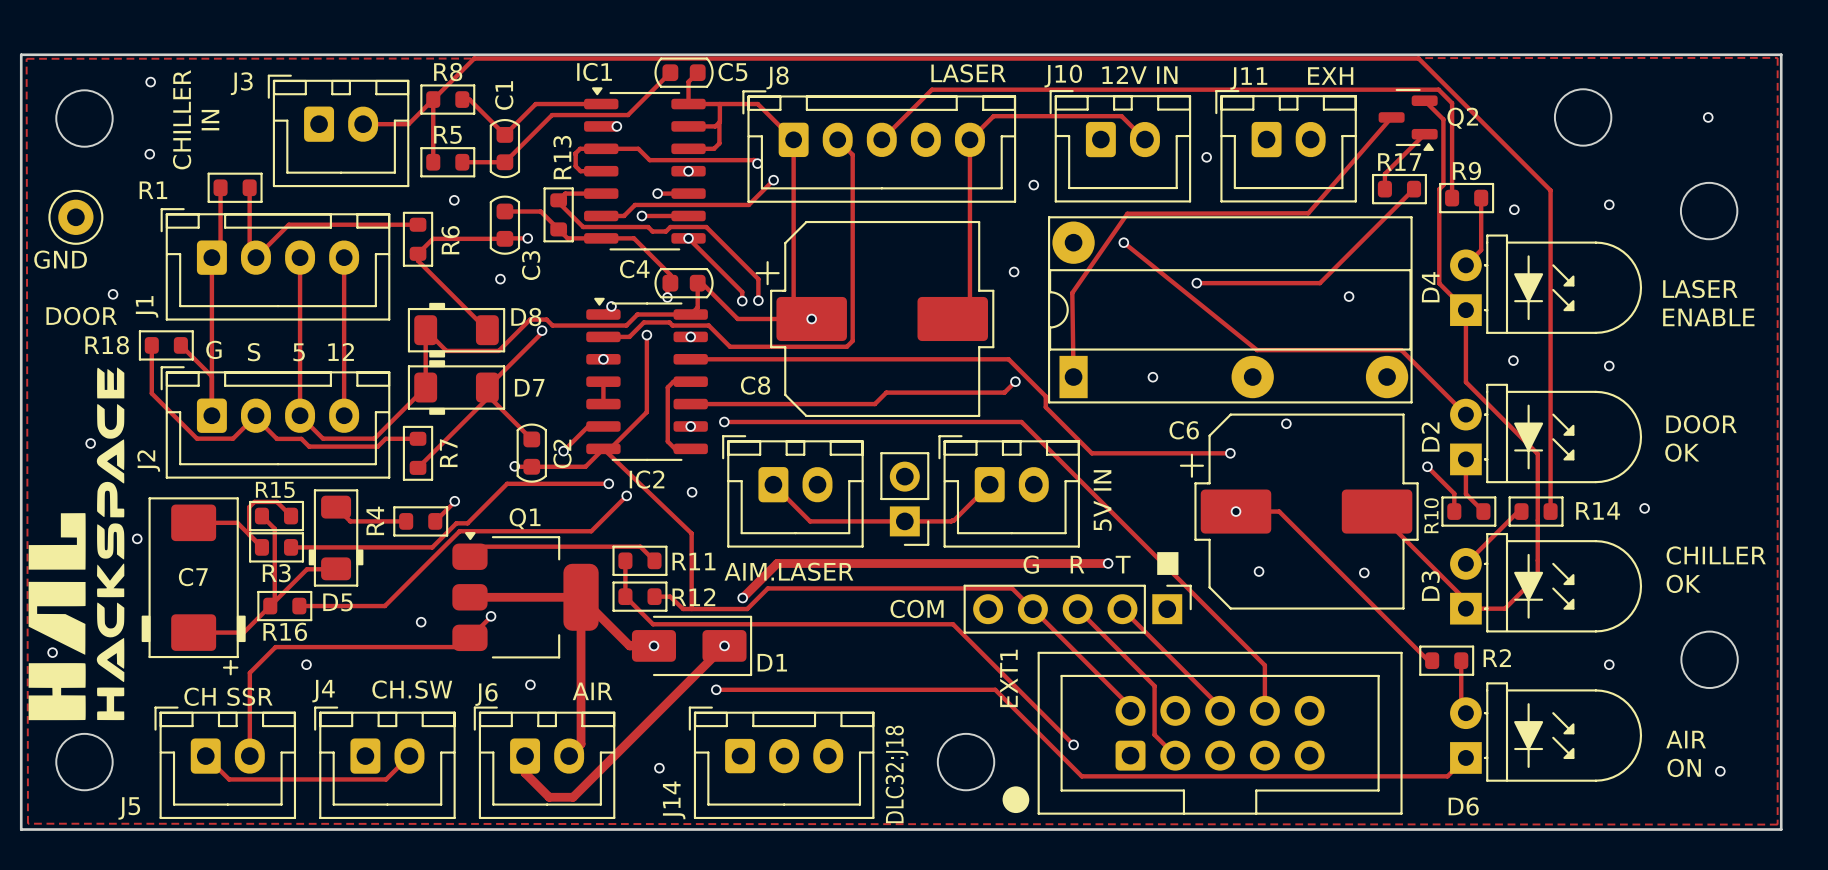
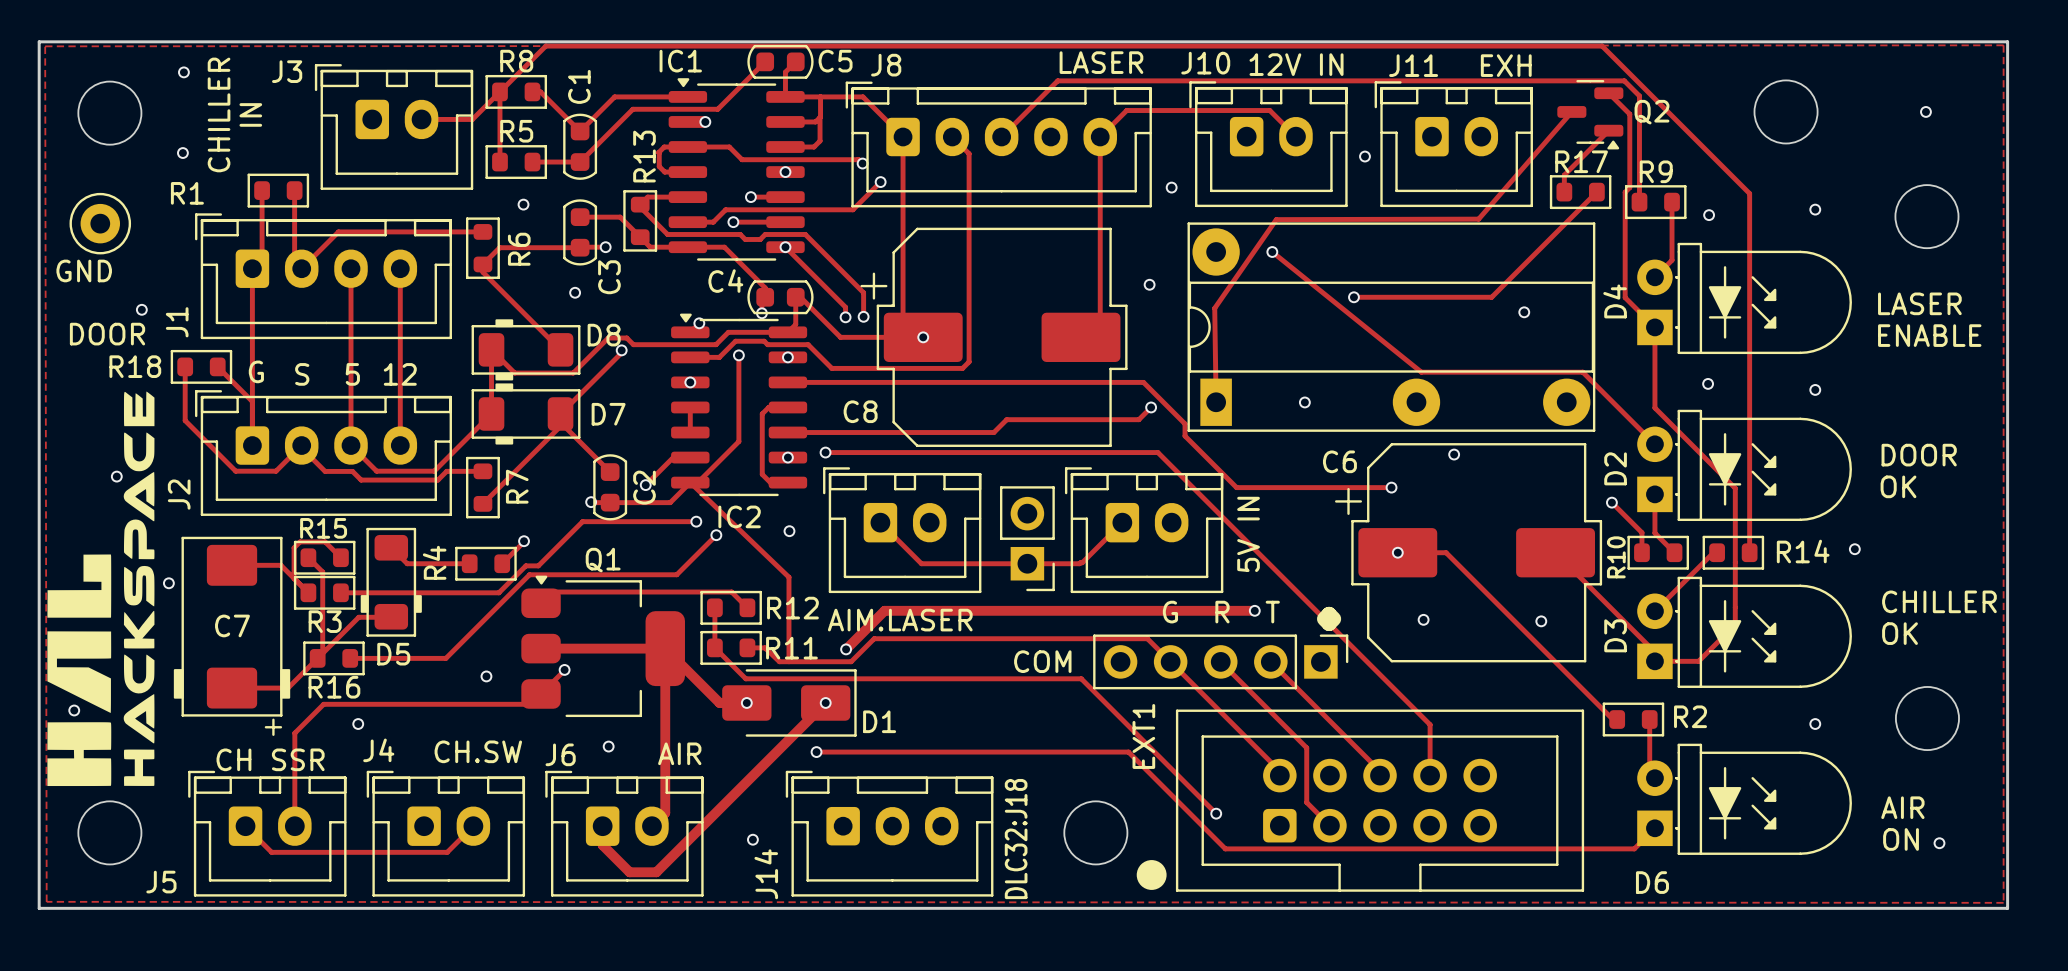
R11 name position: R11 (693, 561) -> R11 (791, 648)
R12 name position: R12 (693, 597) -> R12 (792, 608)

